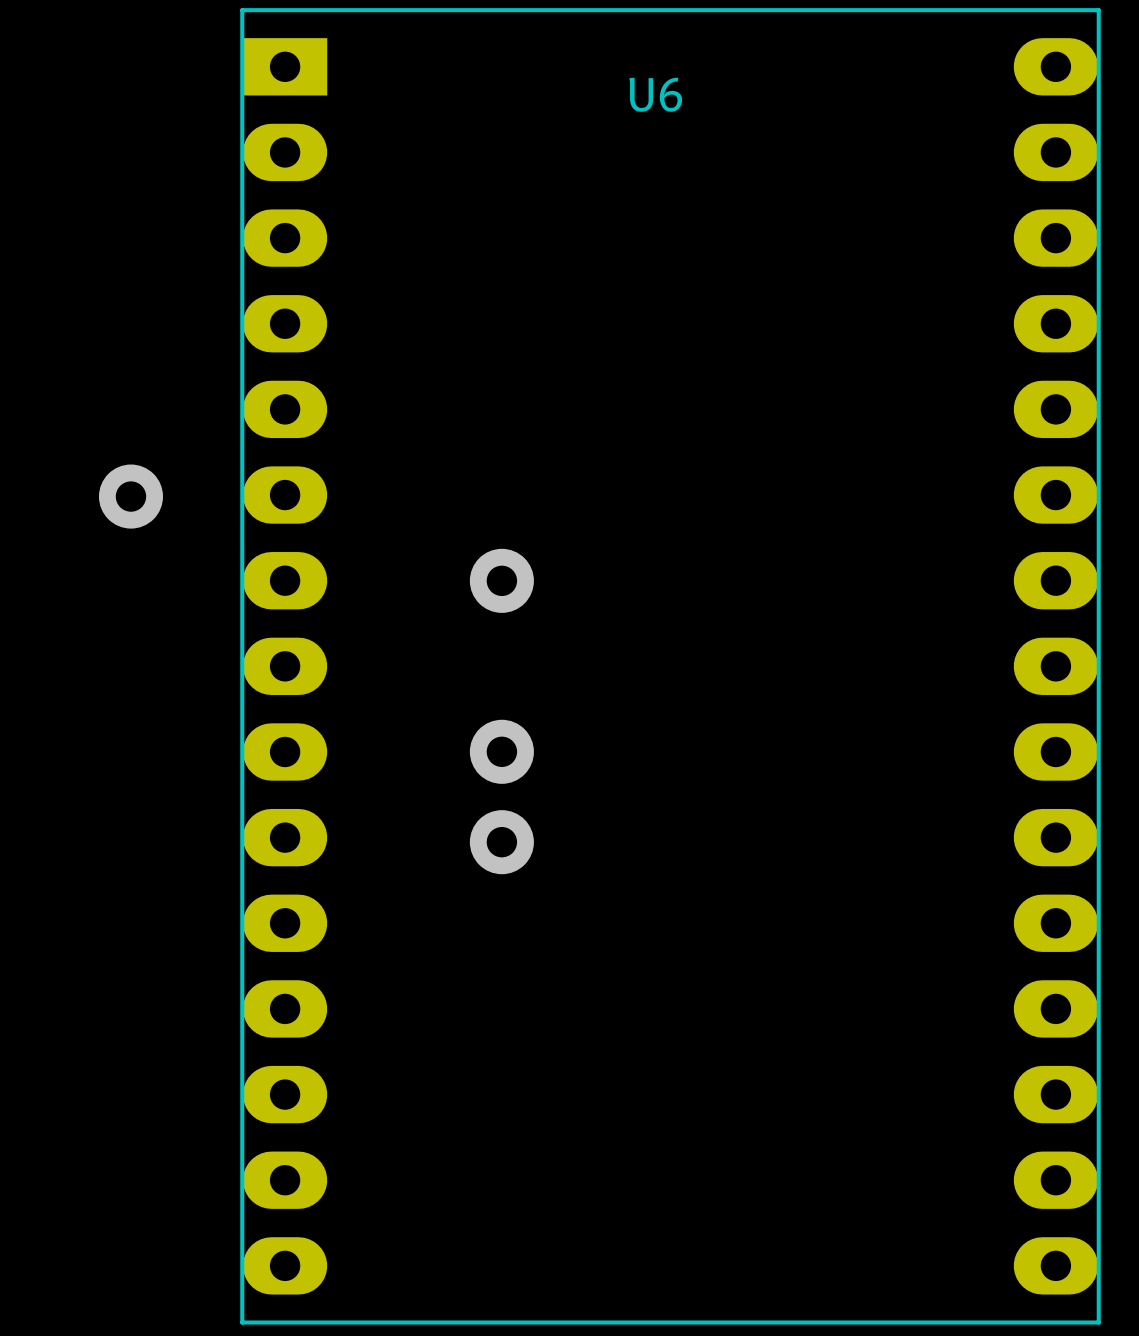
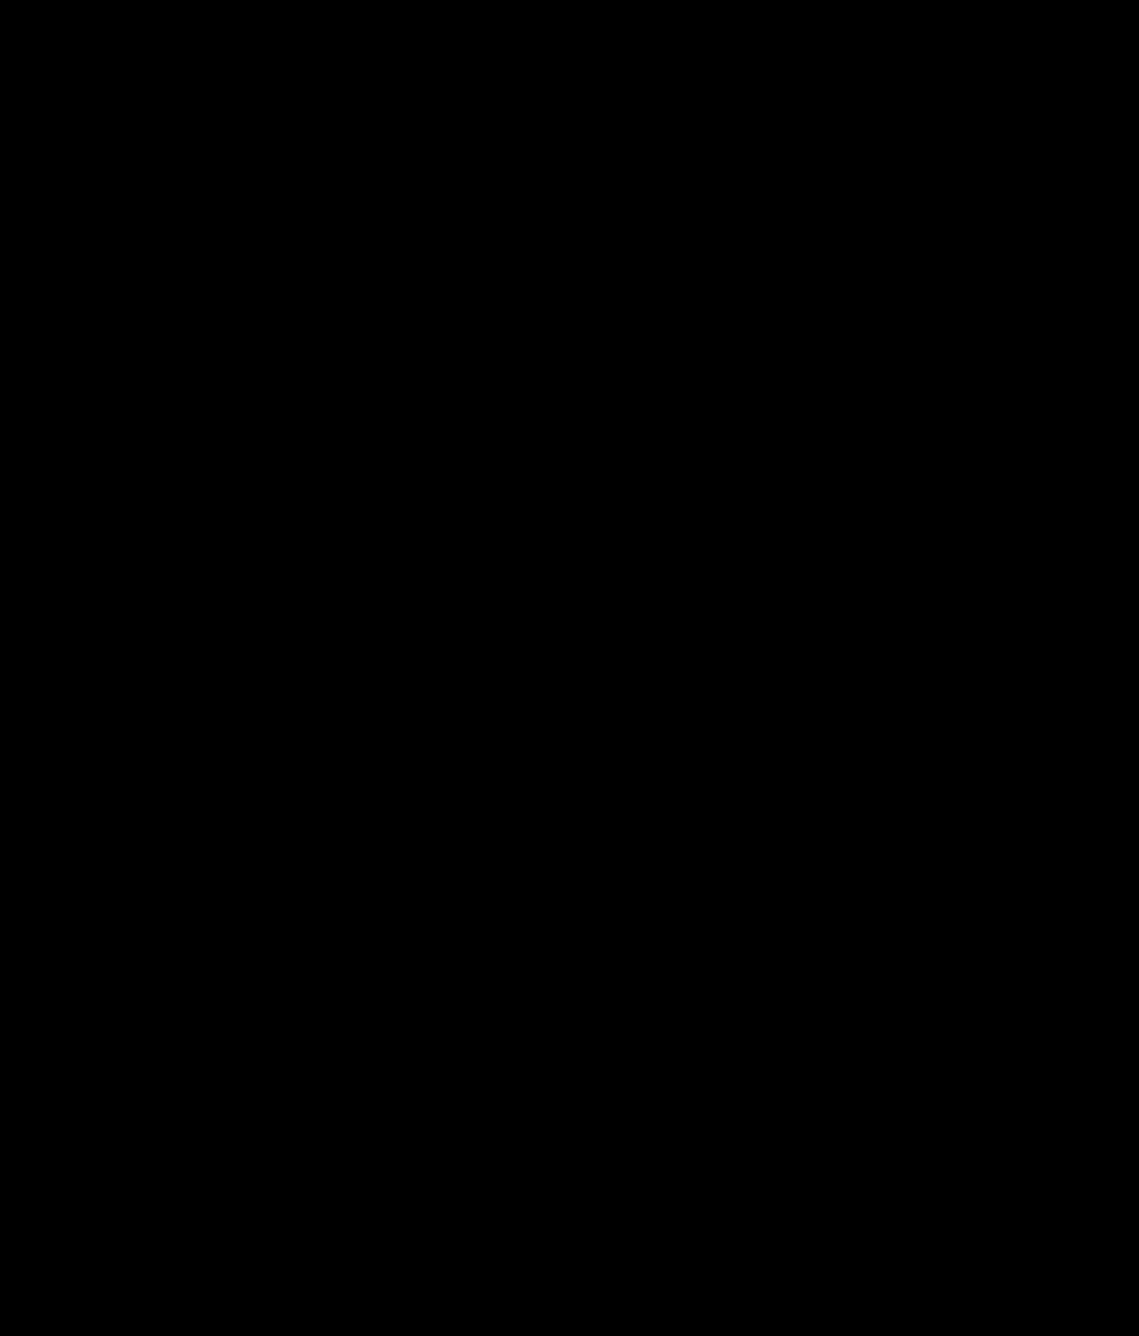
via: (130, 496) -> none
via: (501, 580) -> none
U6: (670, 666) -> none
via: (501, 751) -> none
via: (501, 842) -> none

